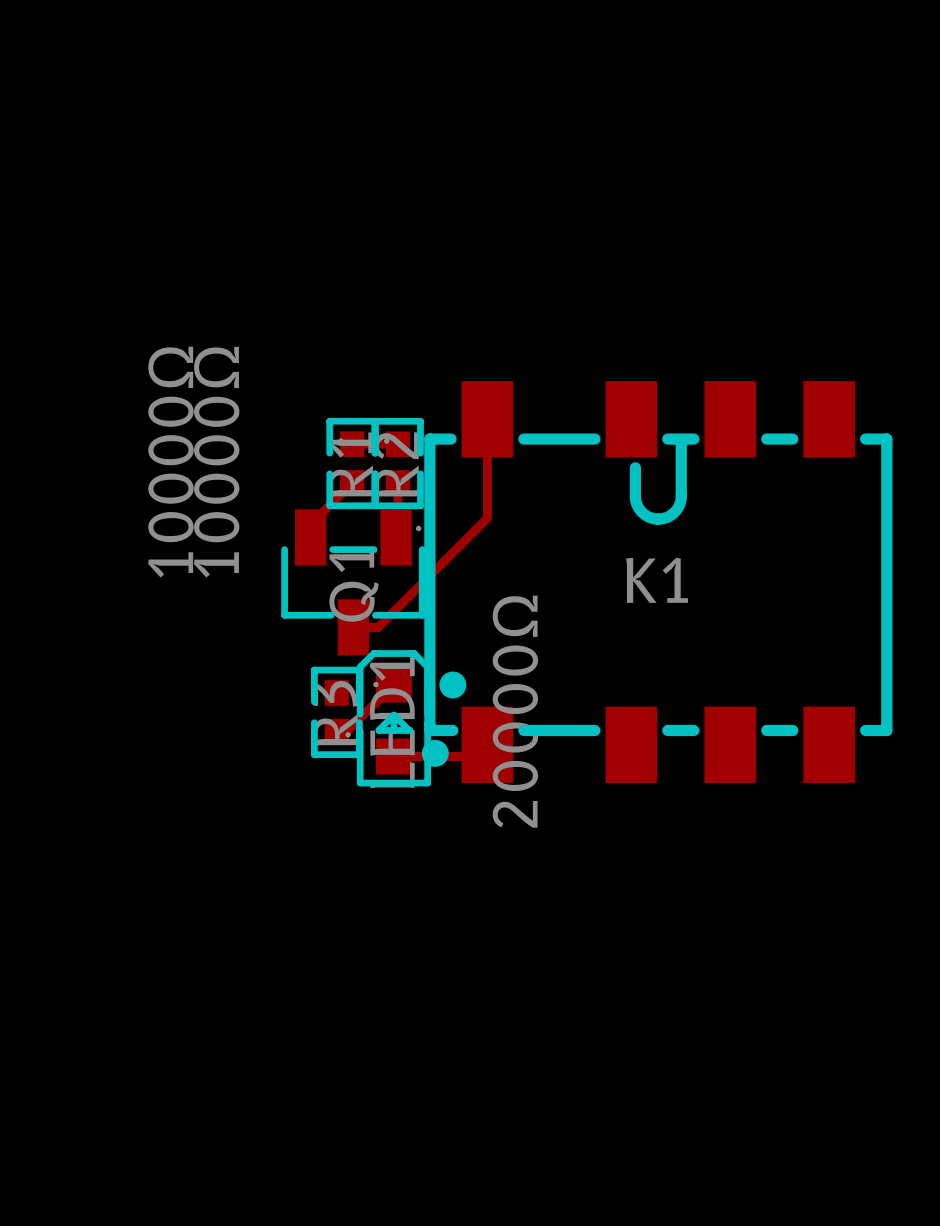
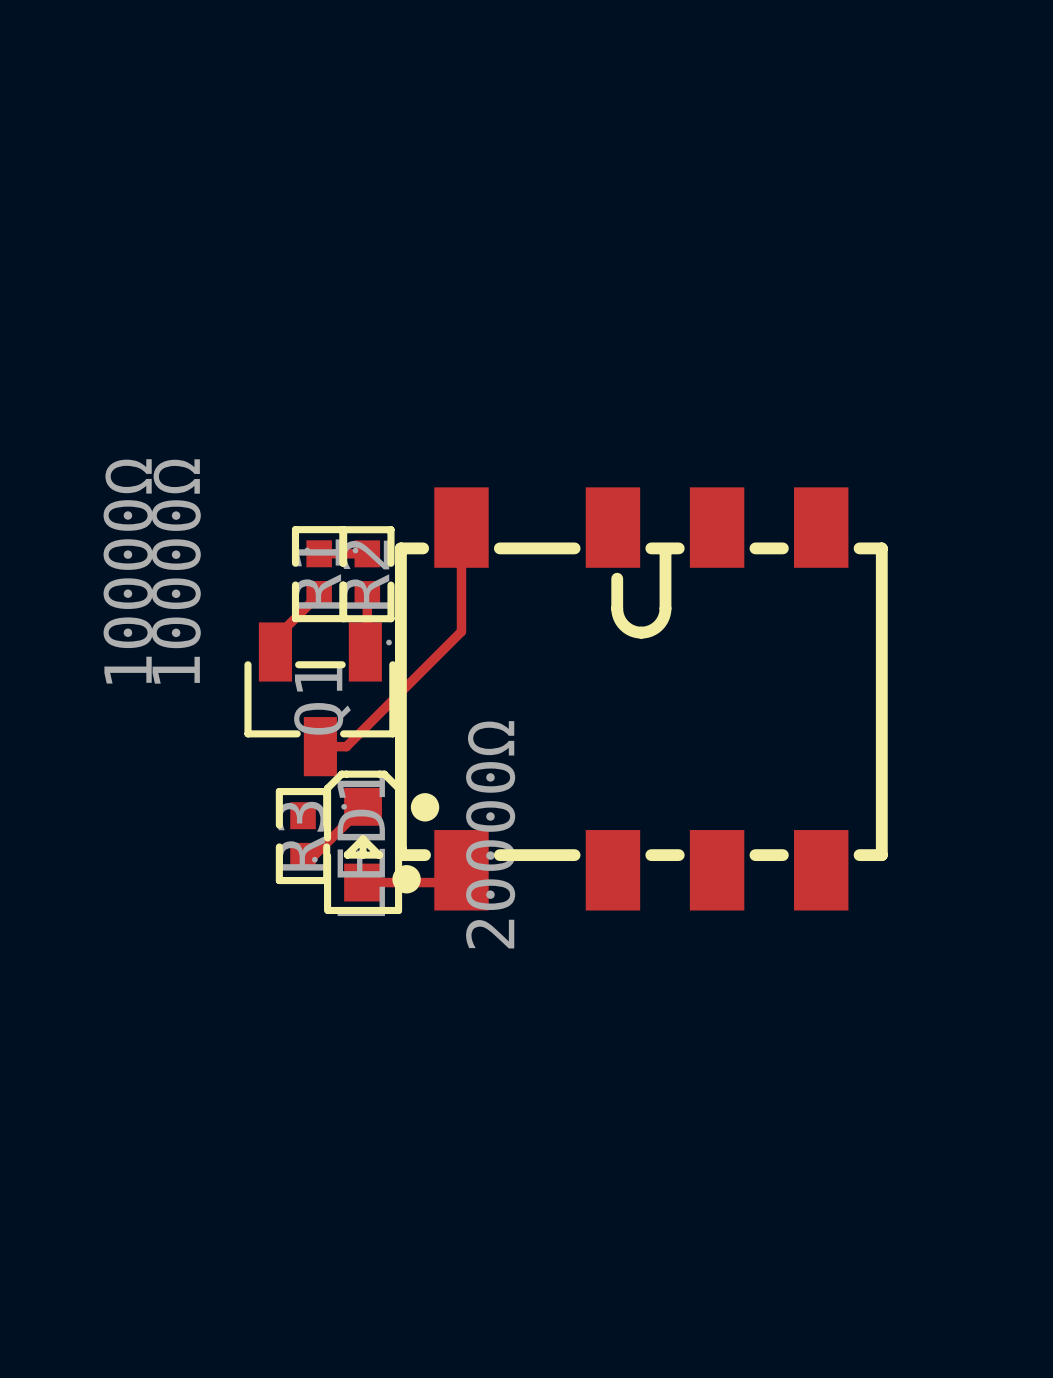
K1: (657, 582) -> none

